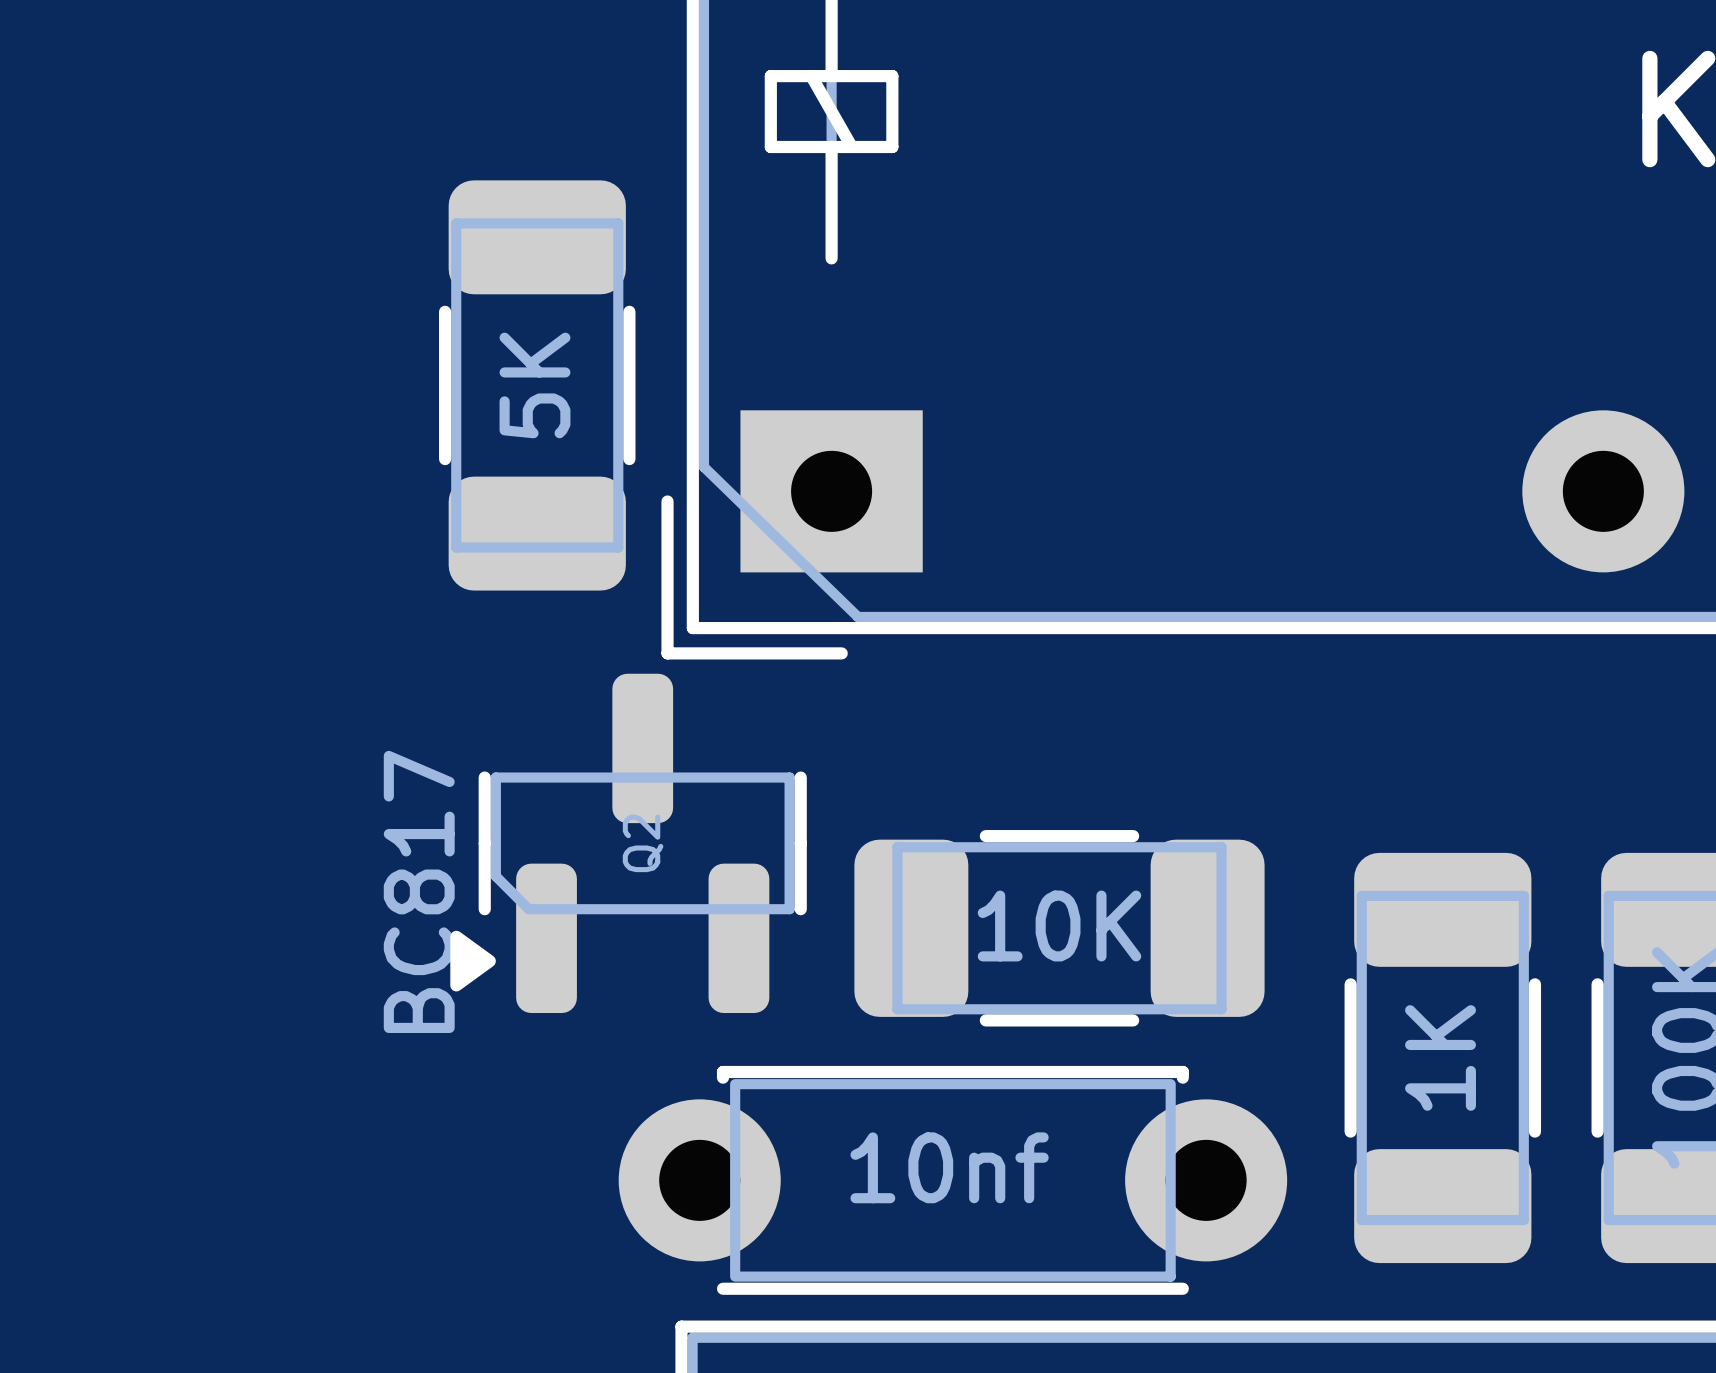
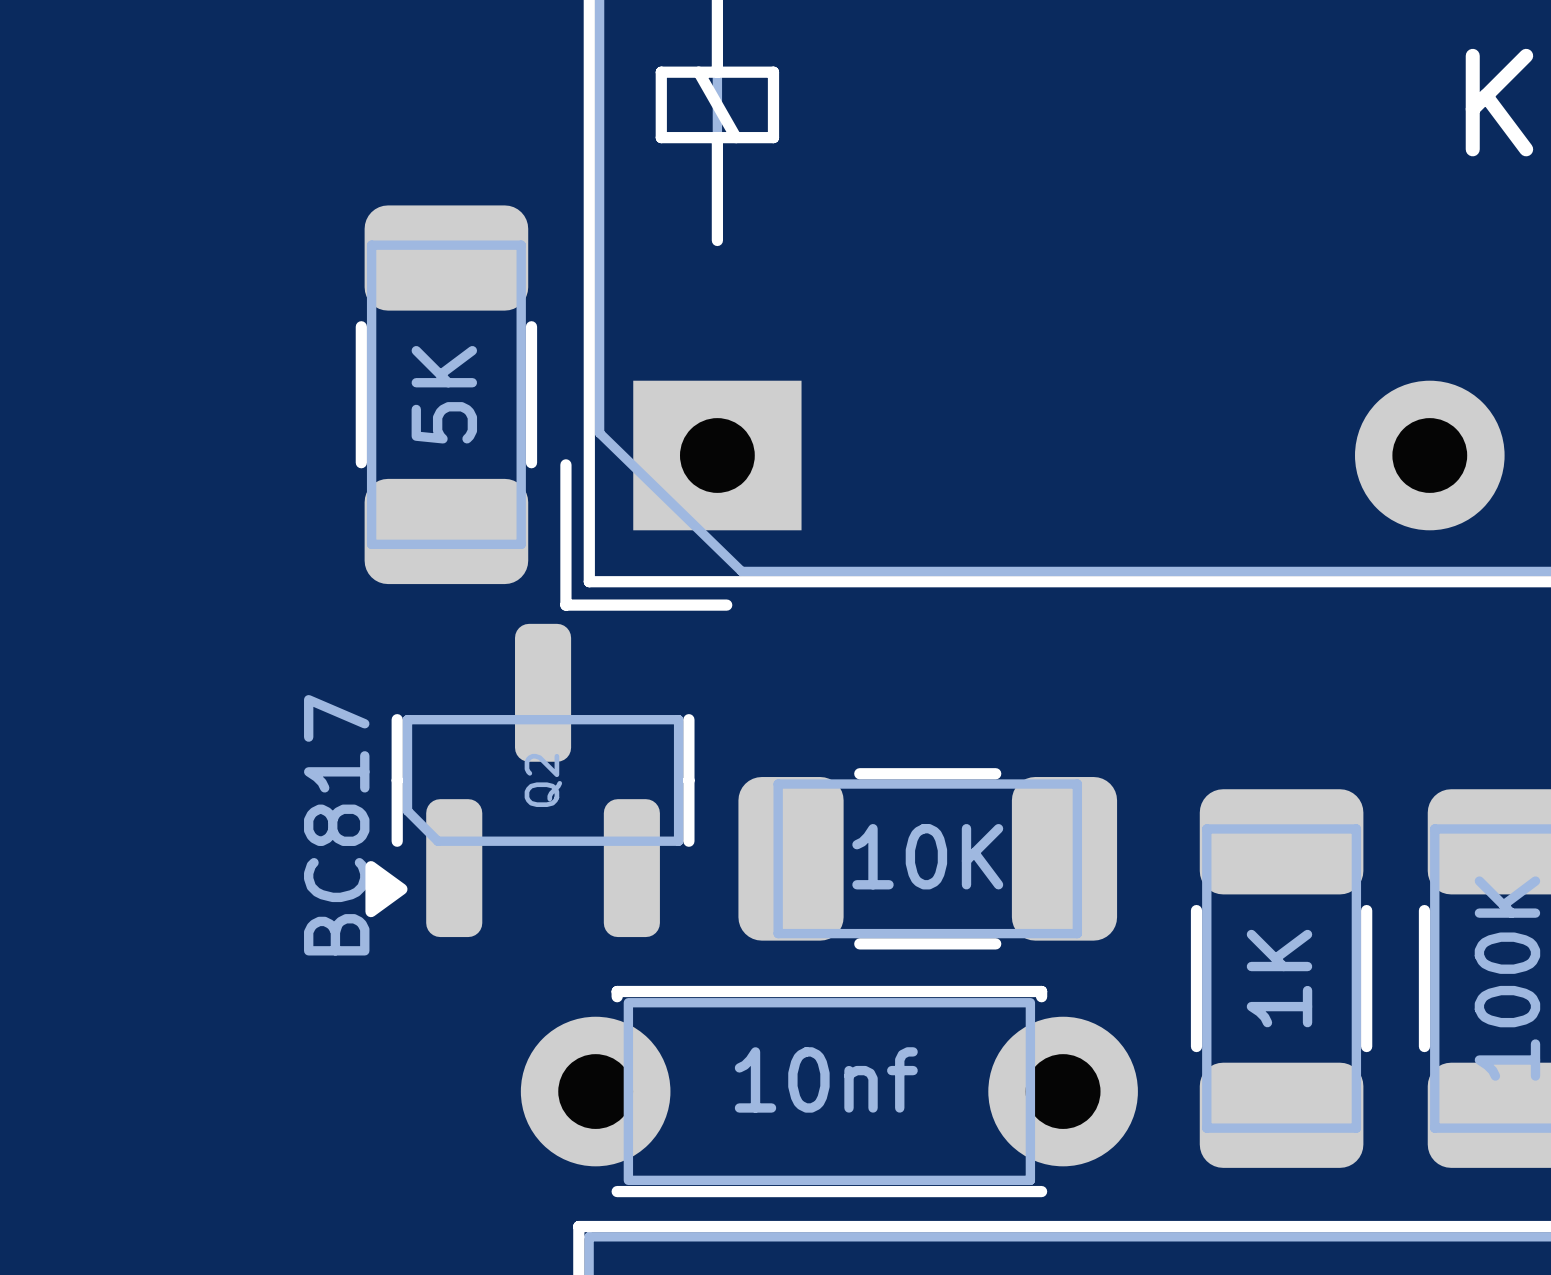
part position: (537, 385) -> (446, 394)

